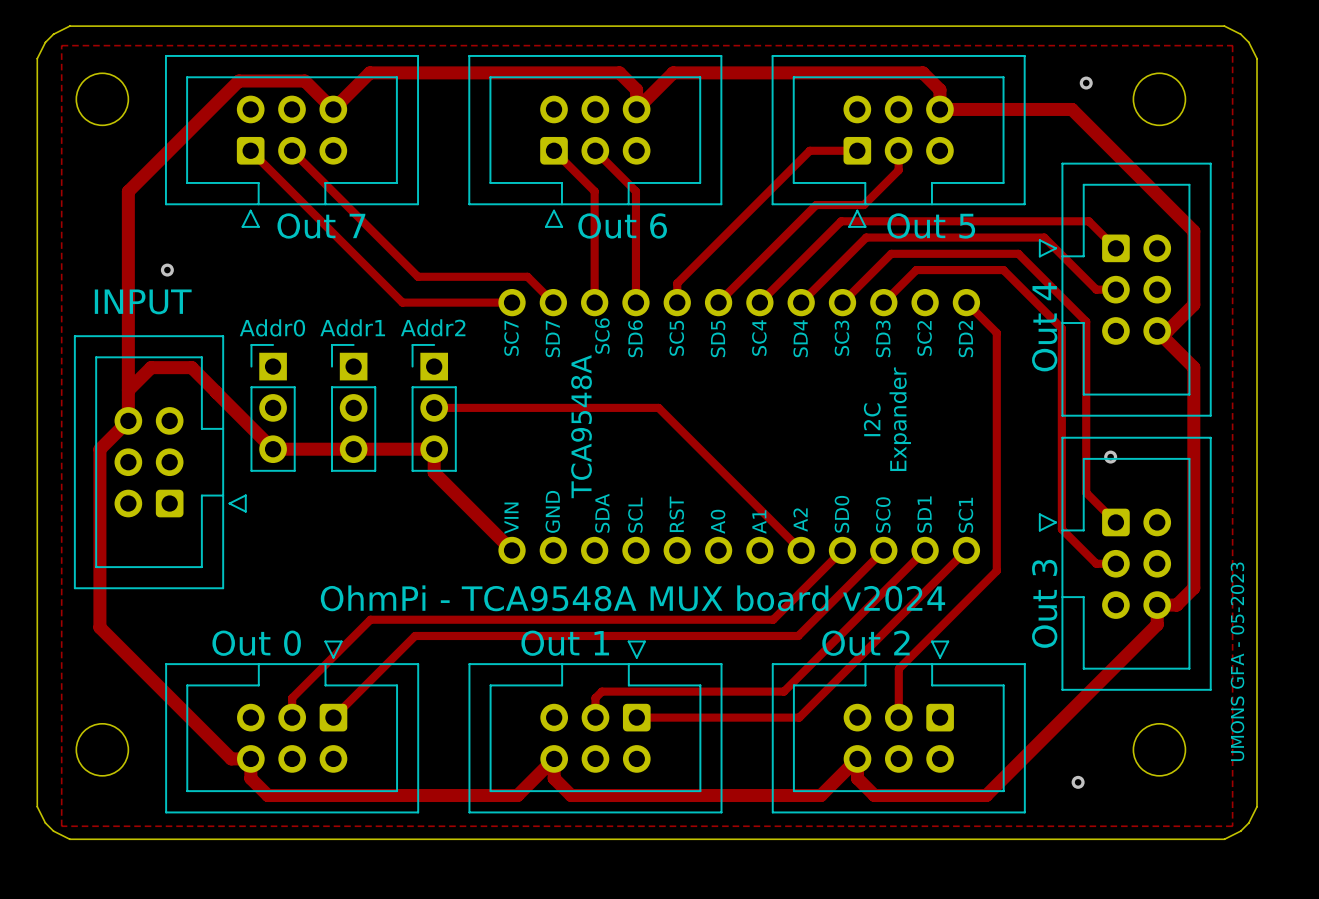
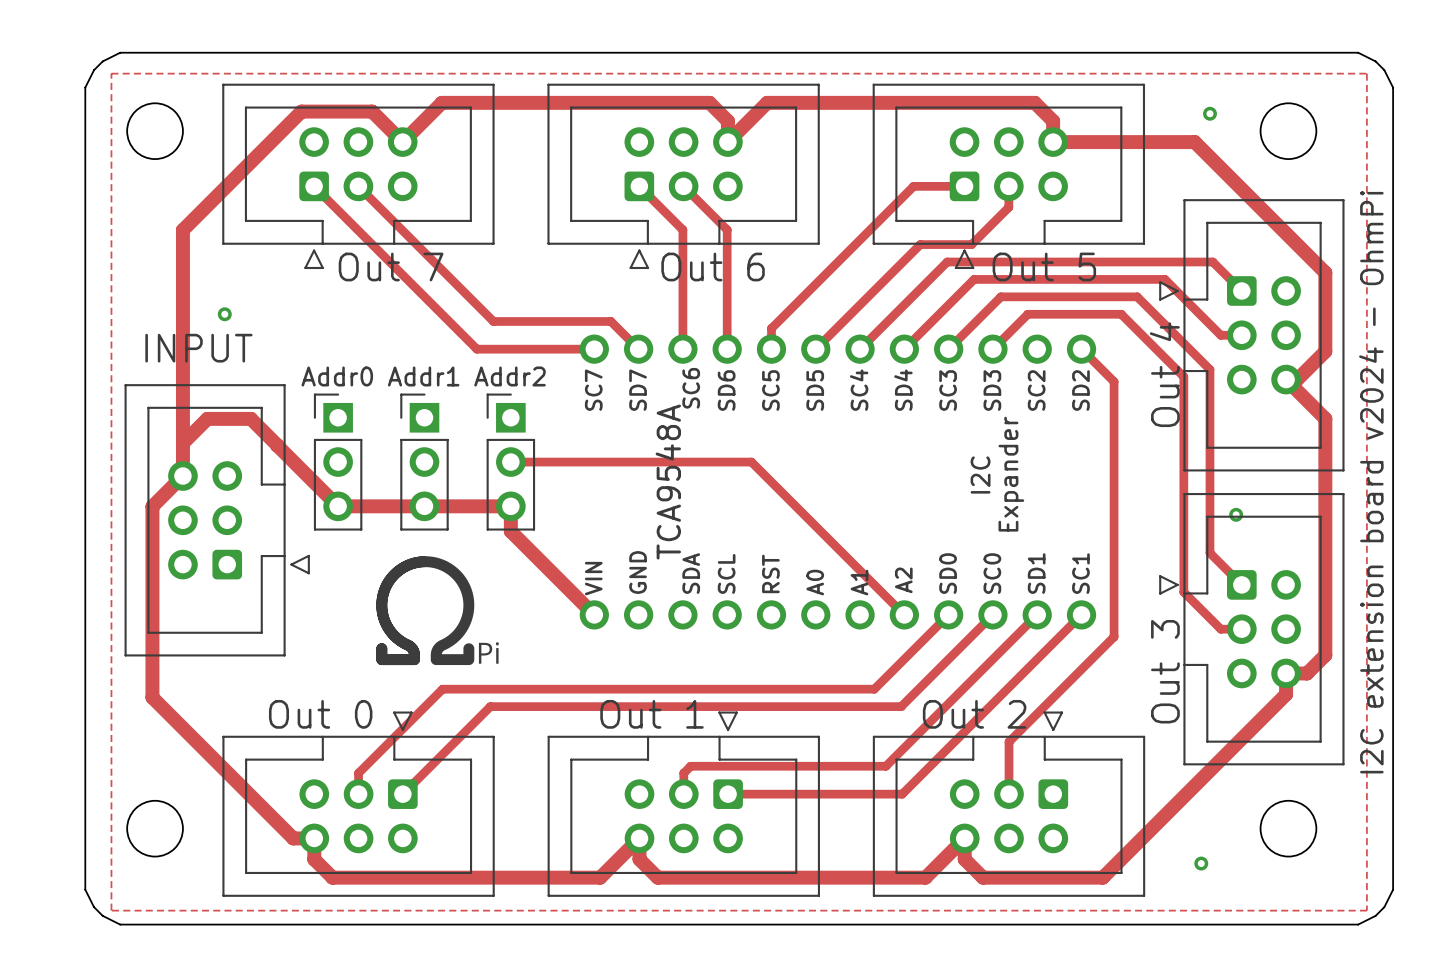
text: none -> I2C extension board v2024 - OhmPi (1371, 482)
drawing: none -> [376, 556, 499, 666]
text: OhmPi - TCA9548A MUX board v2024 (632, 598) -> none
text: UMONS GFA - 05-2023 (1237, 661) -> none

